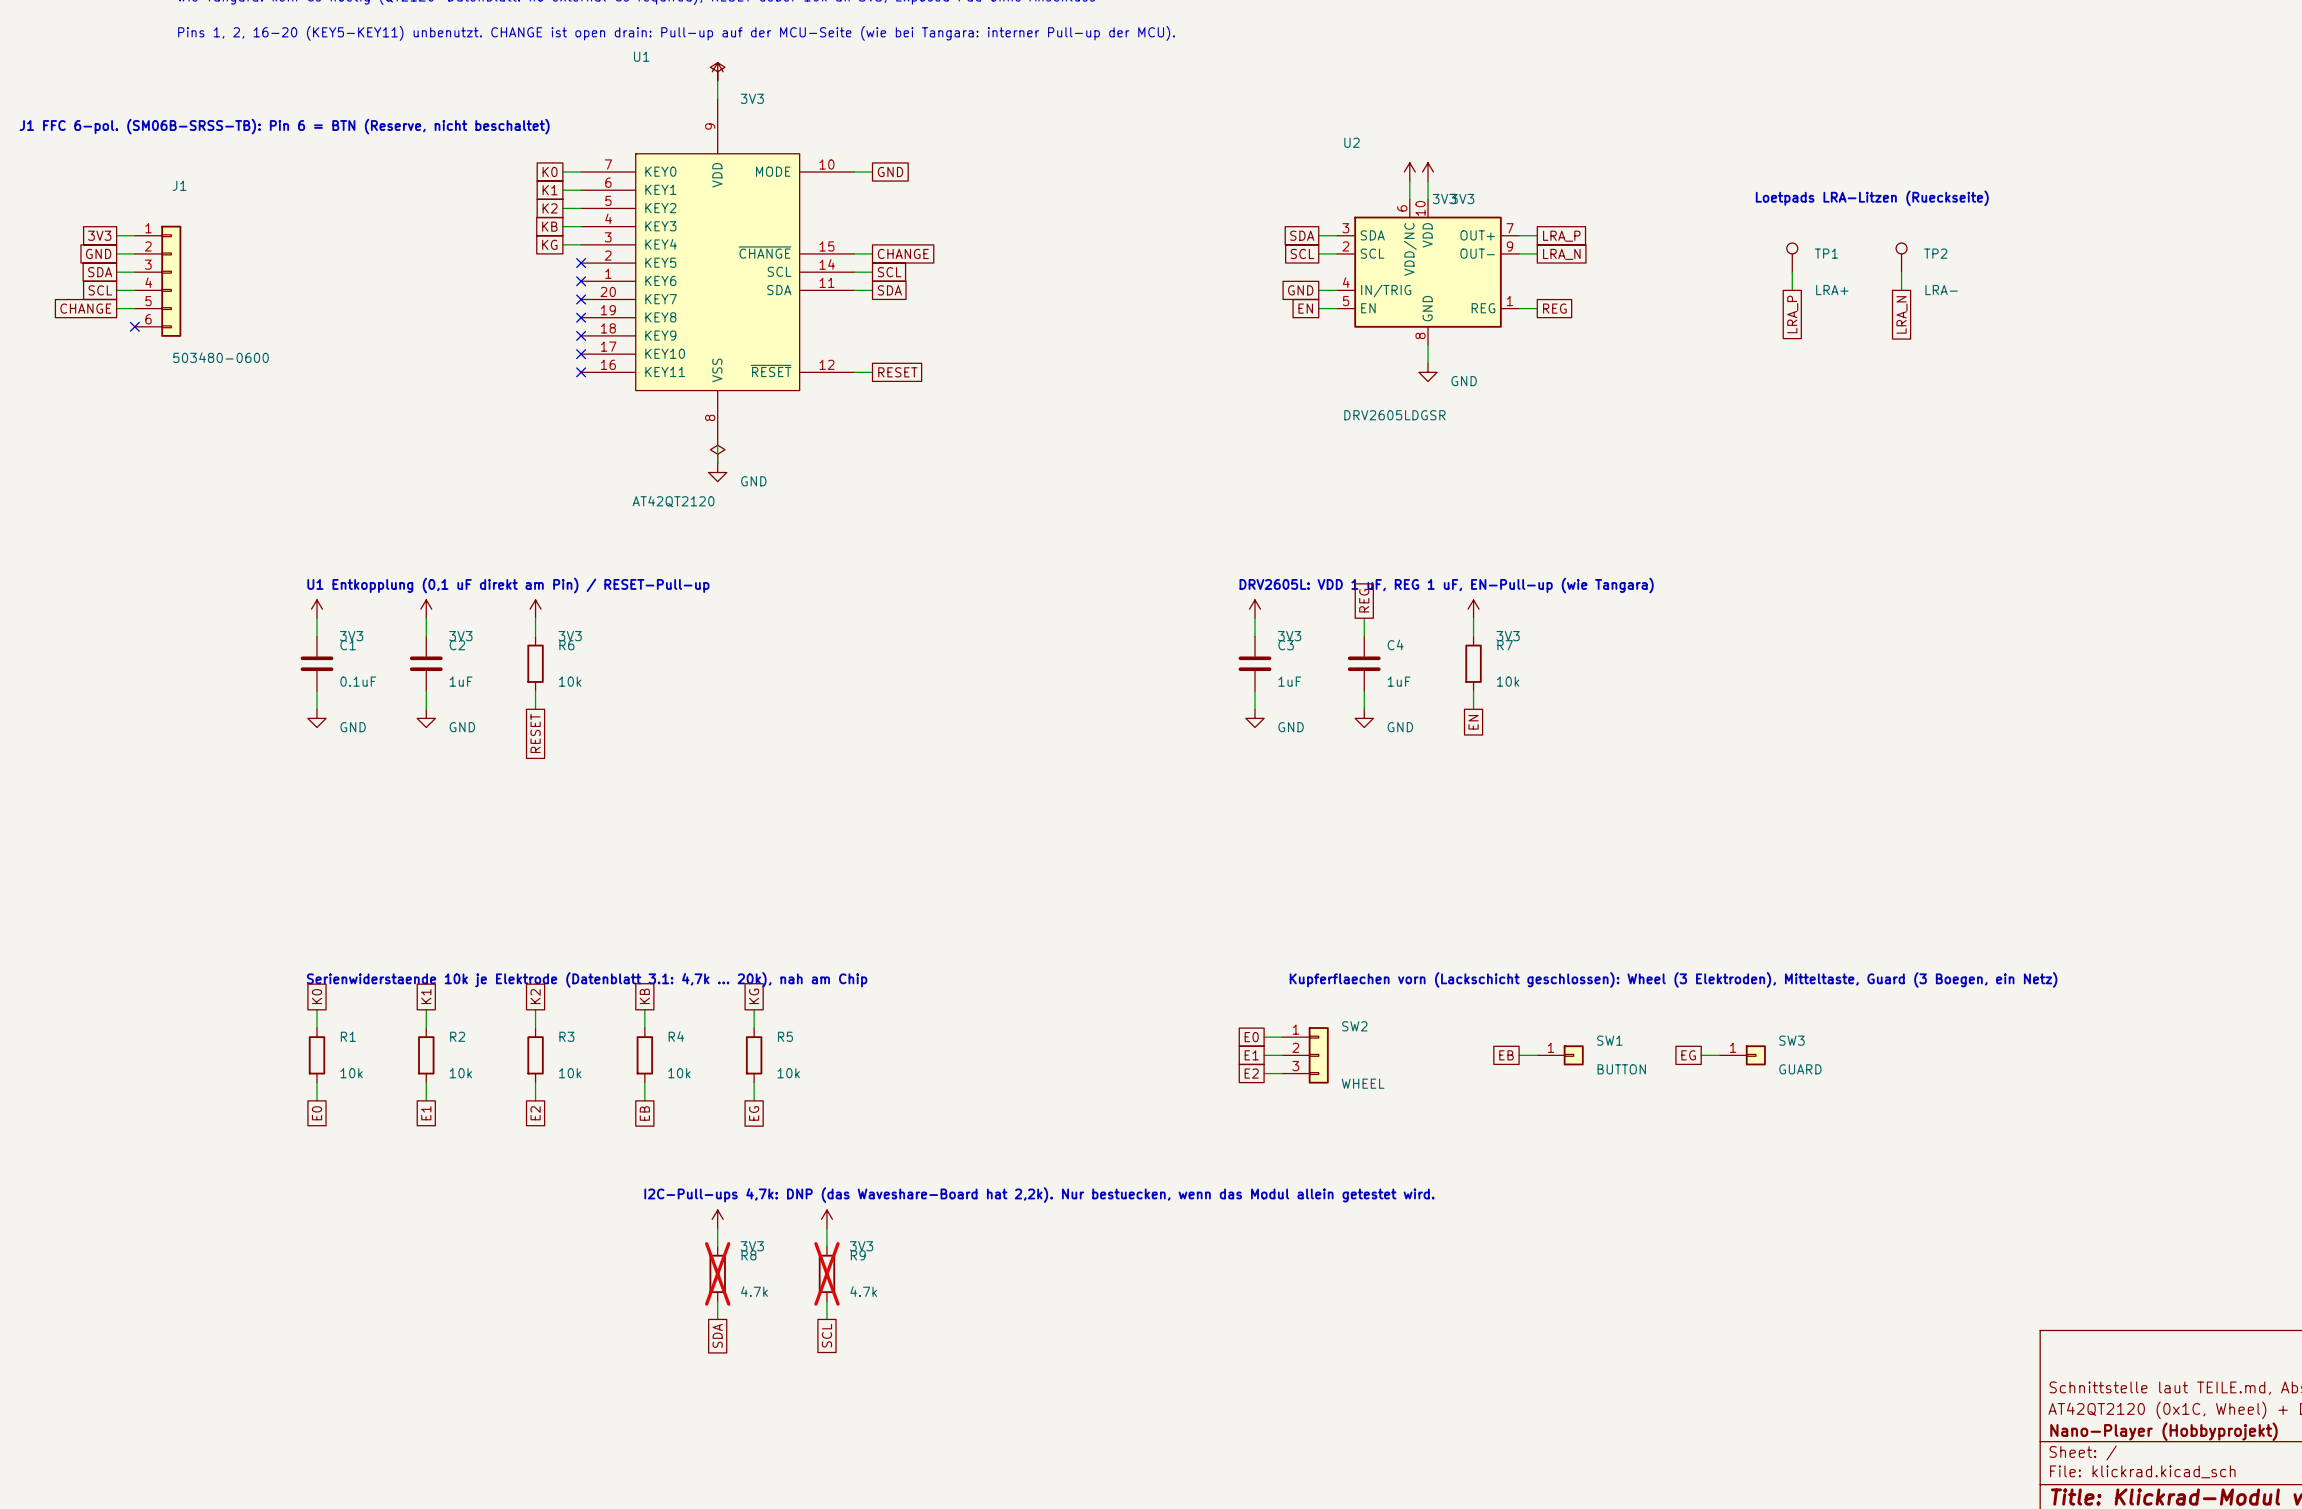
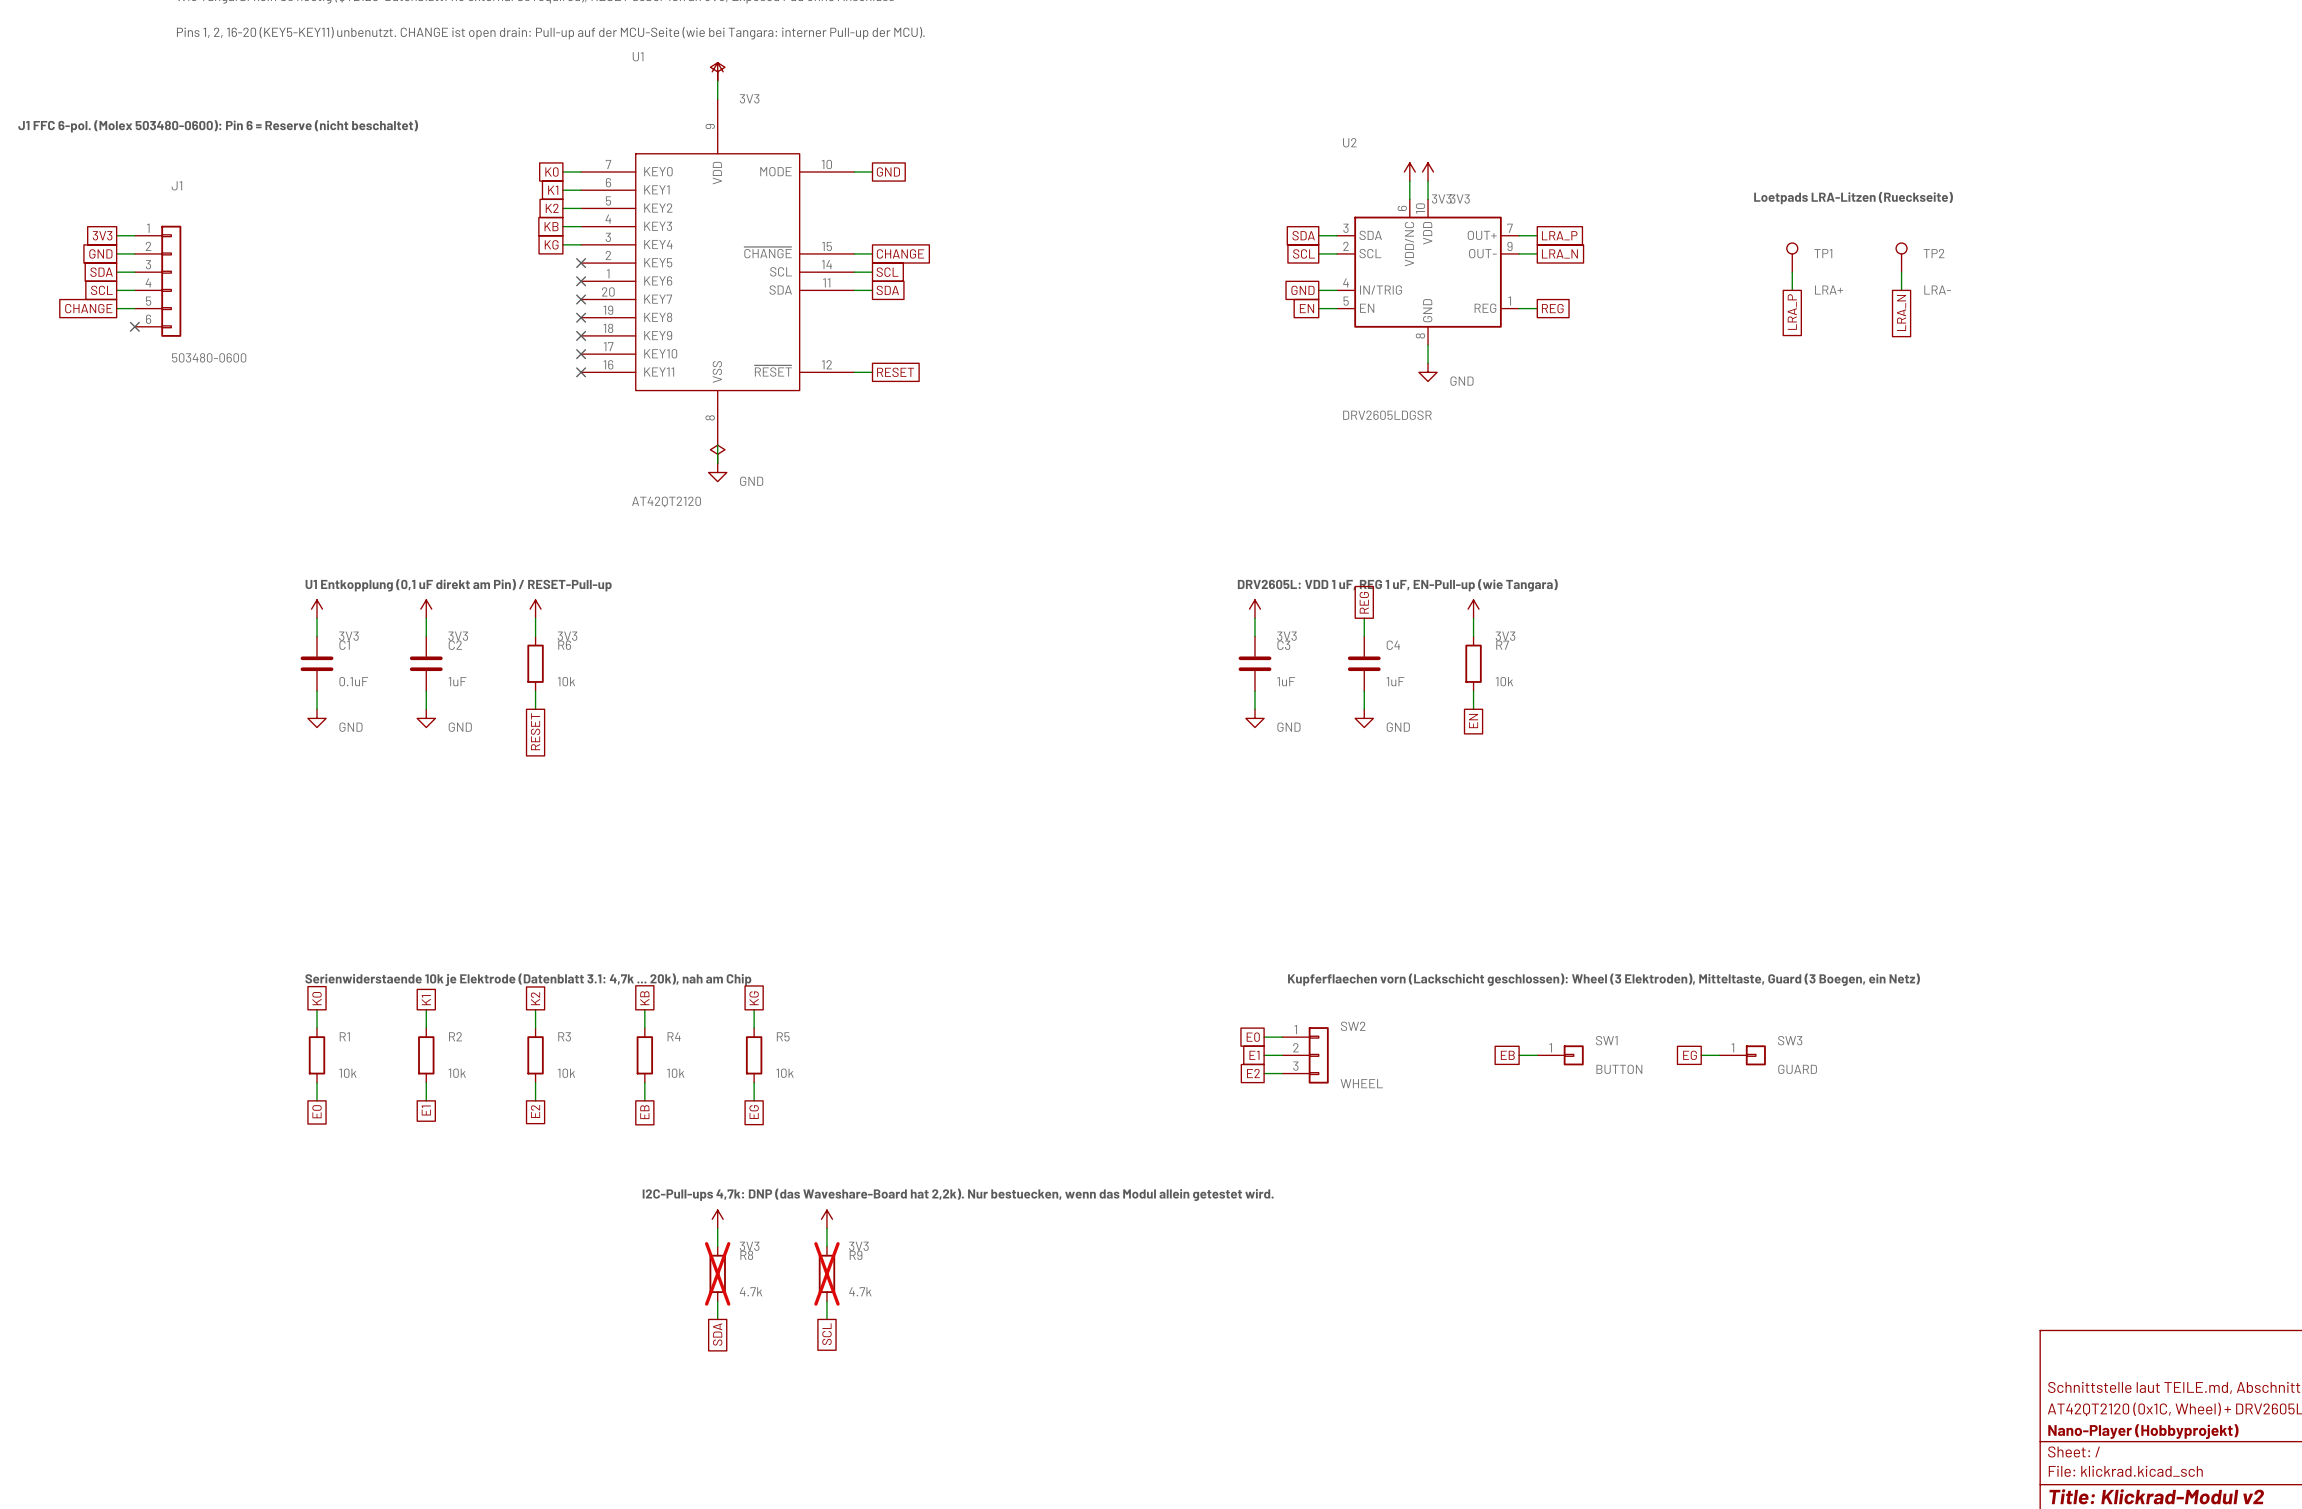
text: J1 FFC 6-pol. (SM06B-SRSS-TB): Pin 6 = BTN (Reserve, nicht beschaltet) (284, 126) -> J1 FFC 6-pol. (Molex 503480-0600): Pin 6 = Reserve (nicht beschaltet) (218, 126)

